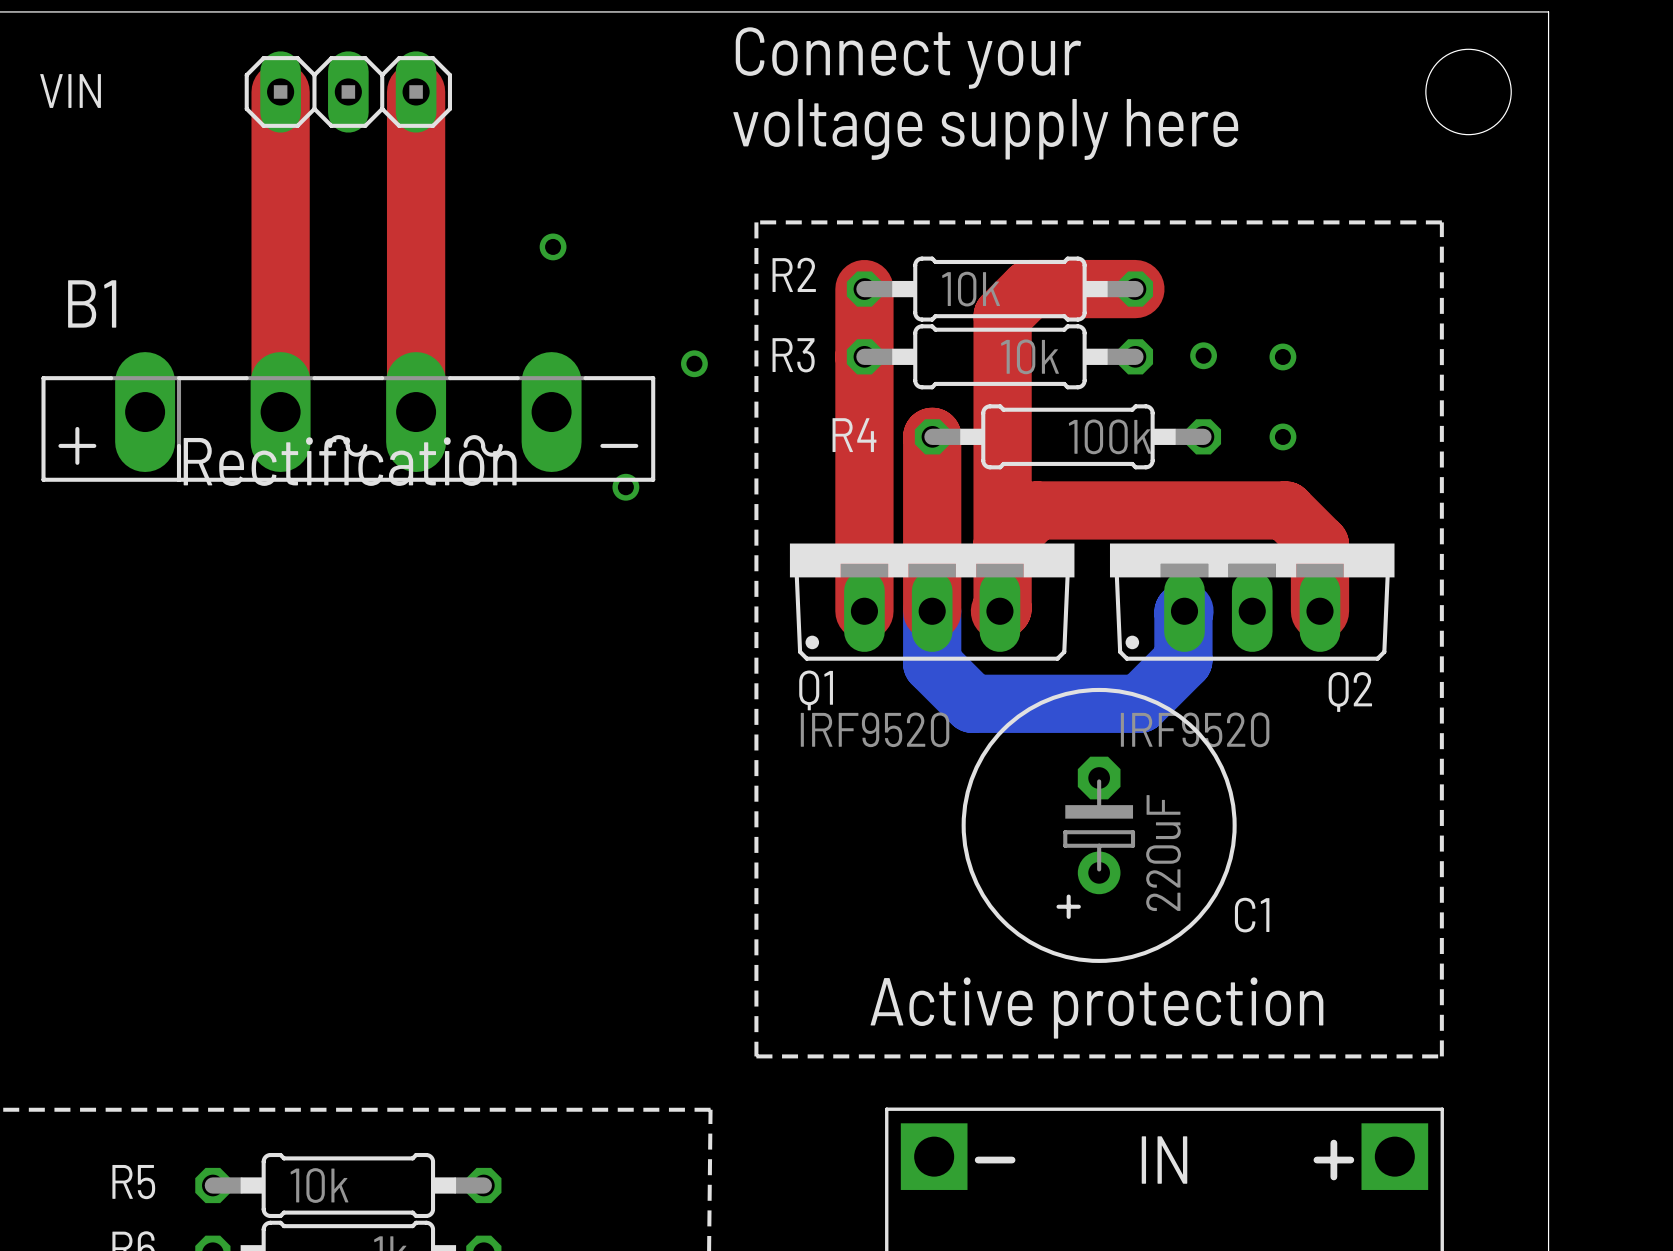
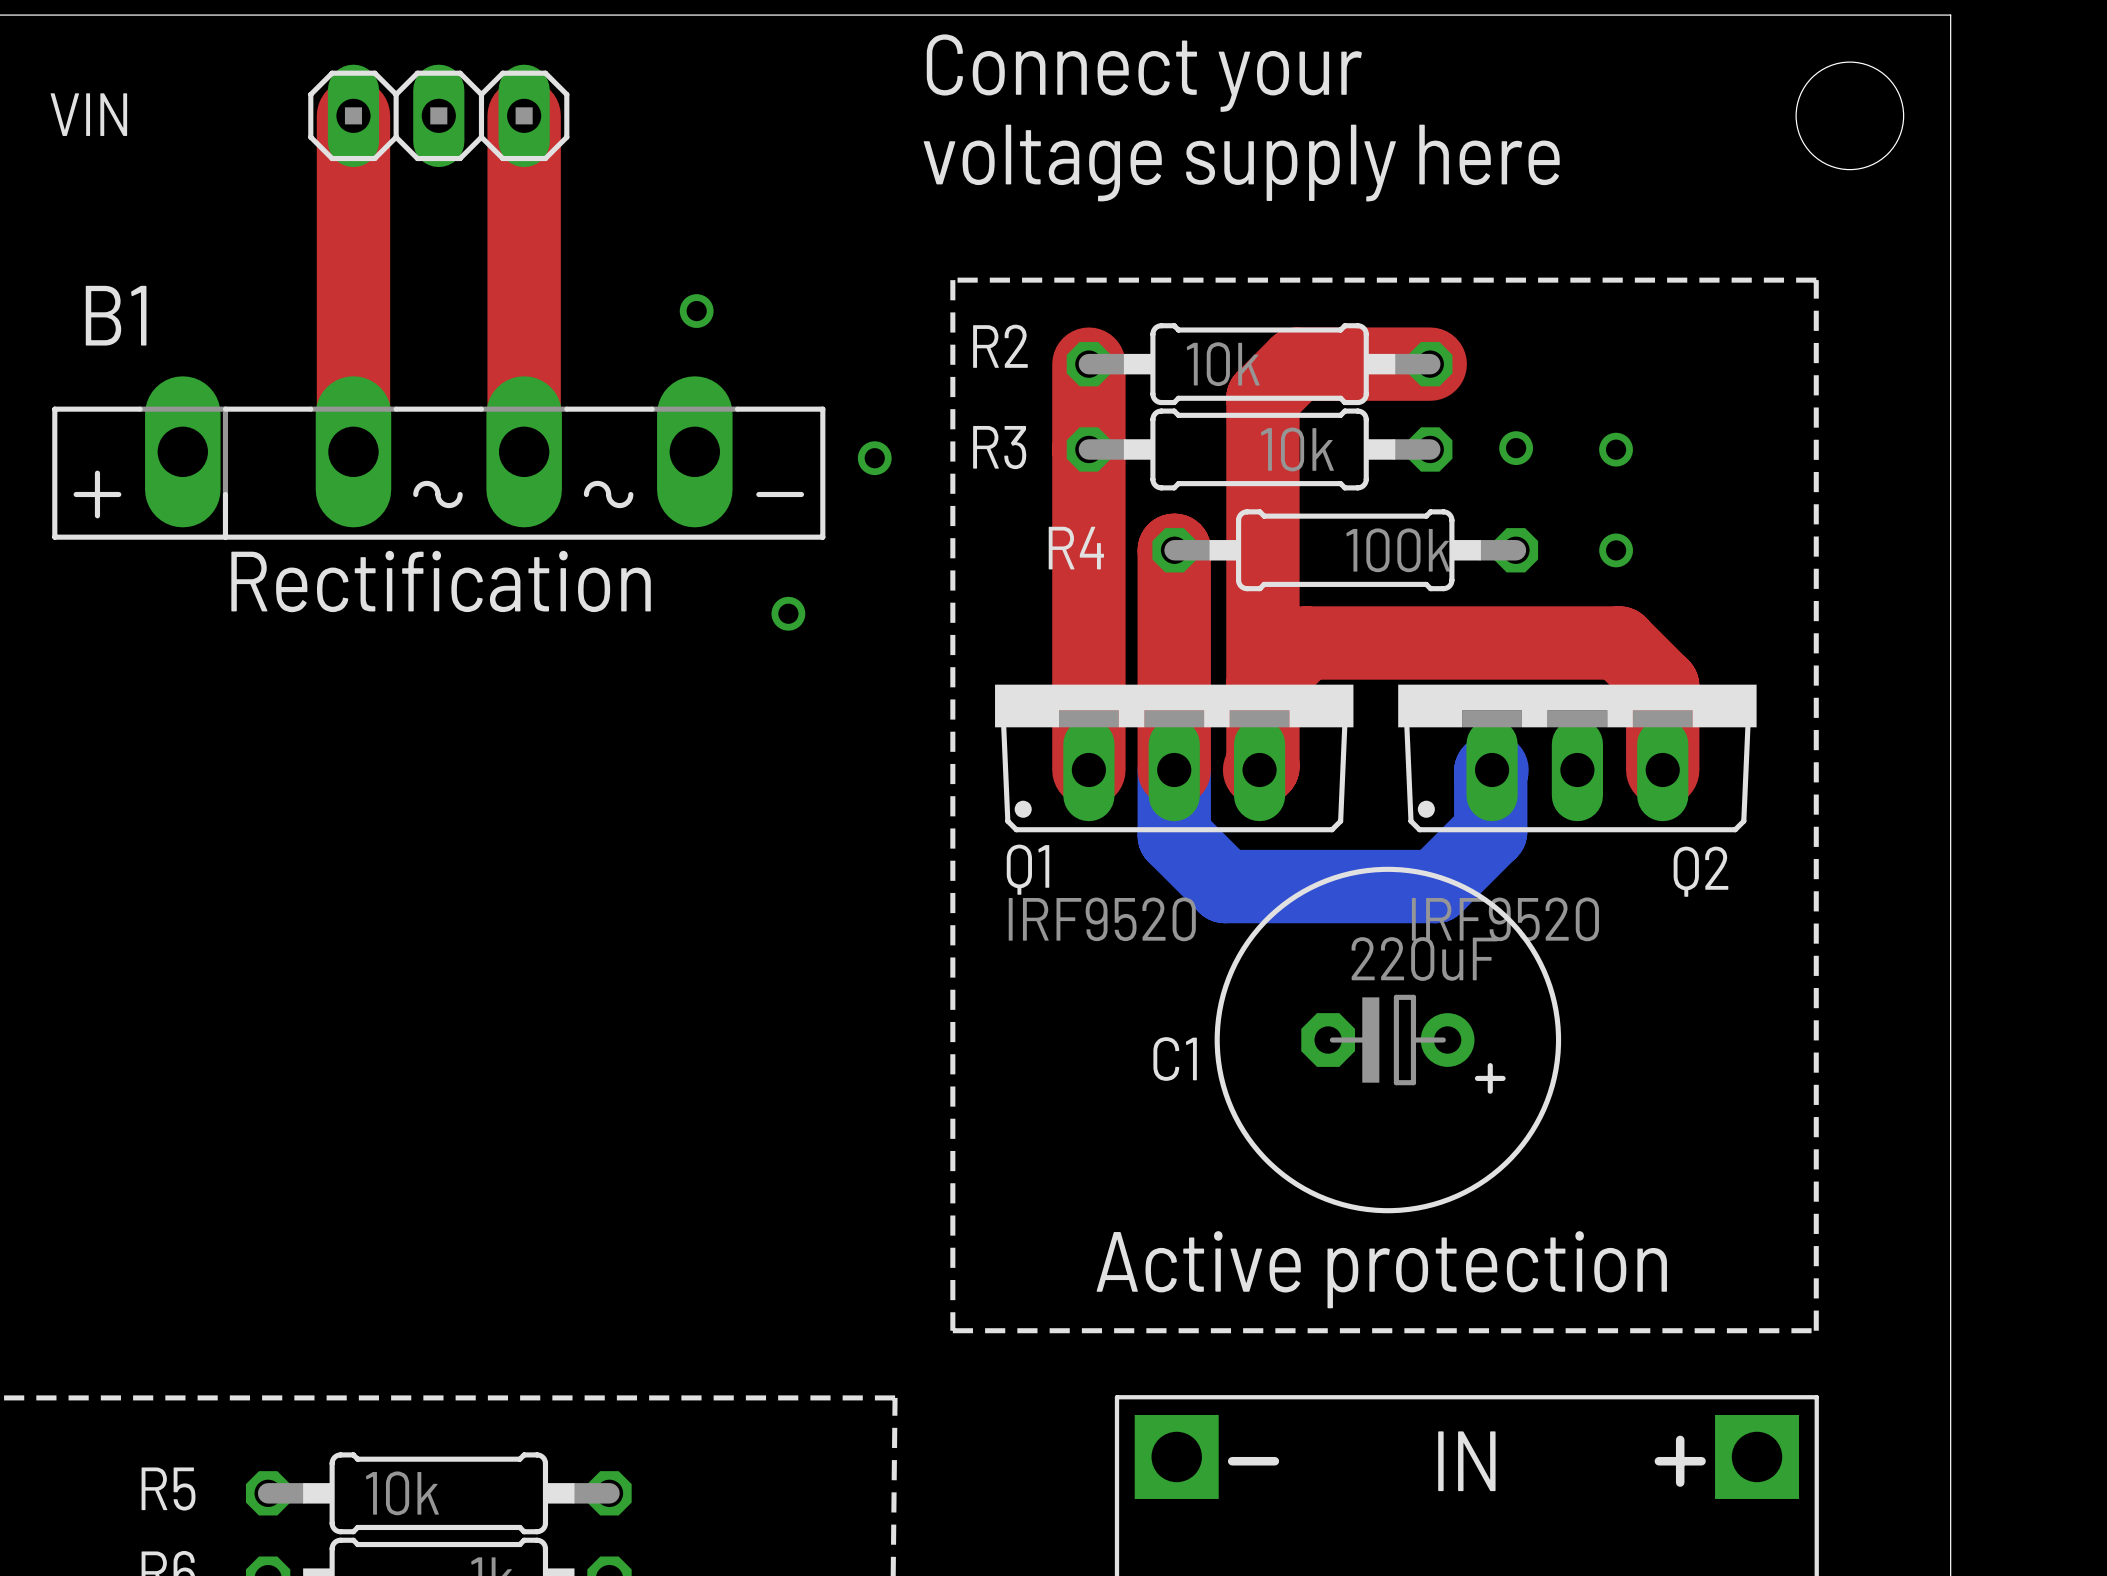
B1 position: (348, 416) -> (438, 458)
C1 rotation: 0° (1099, 825) -> 90° counterclockwise (1387, 1040)
C1 name position: C1 (1252, 915) -> C1 (1175, 1059)

